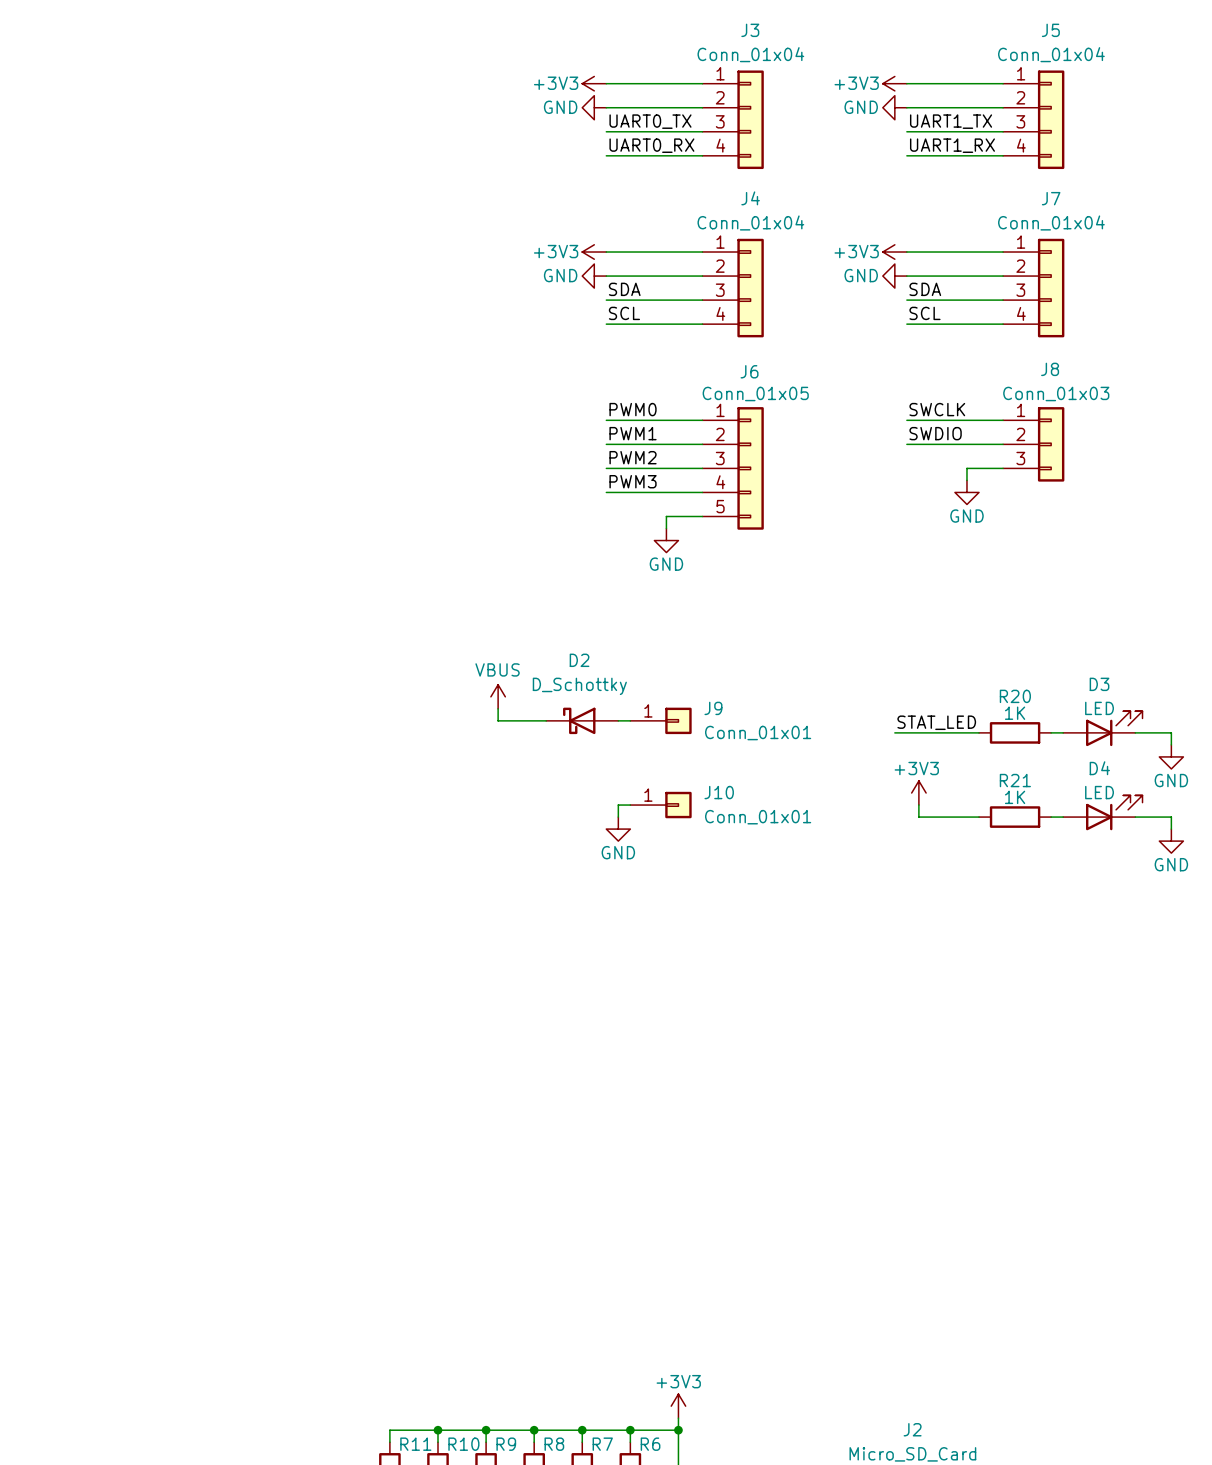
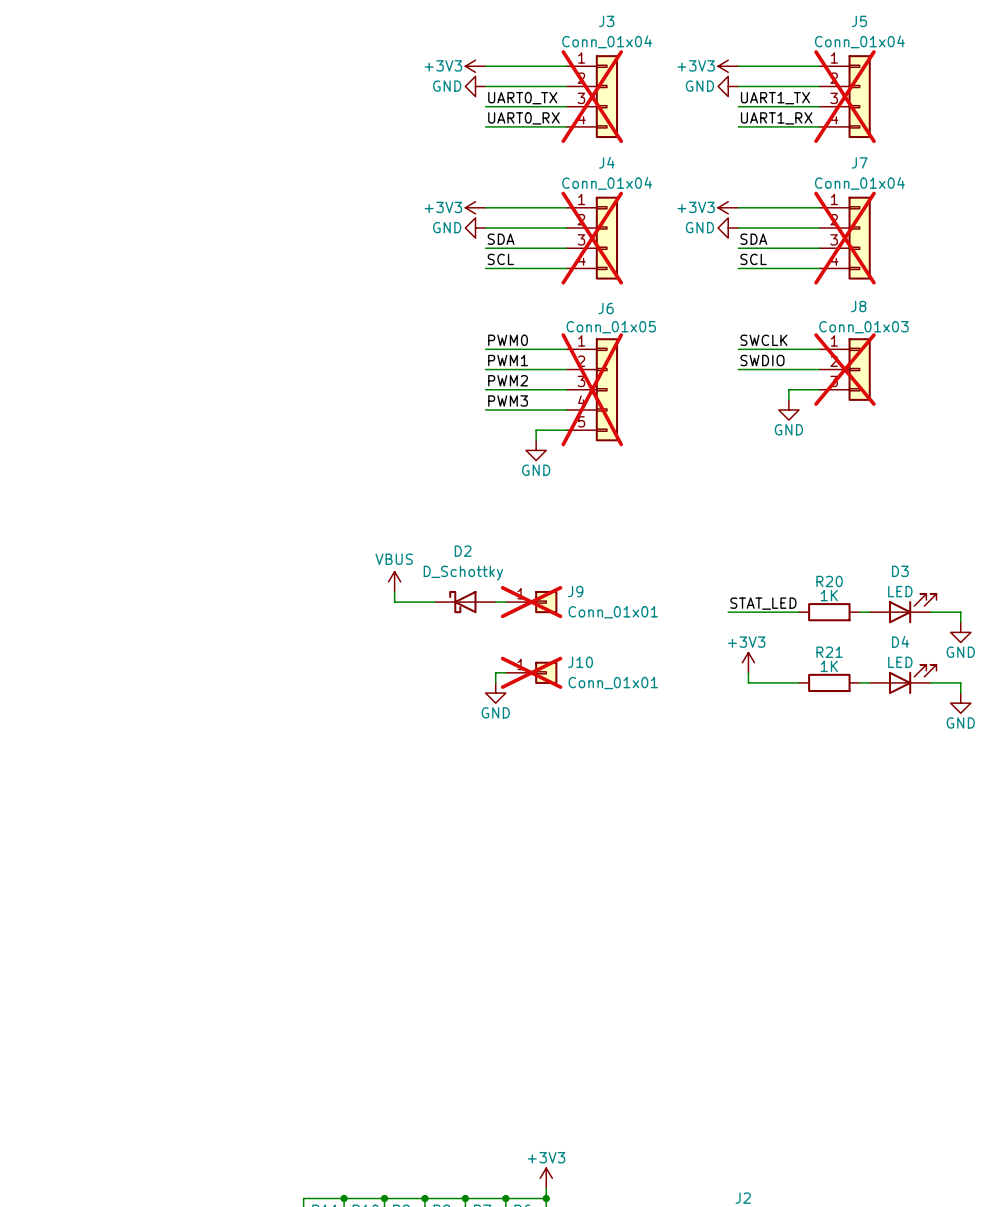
J3 do-not-place cross: none -> (592, 96)
J5 do-not-place cross: none -> (844, 96)
J4 do-not-place cross: none -> (592, 238)
J7 do-not-place cross: none -> (844, 238)
J8 do-not-place cross: none -> (844, 369)
J6 do-not-place cross: none -> (592, 389)
J9 do-not-place cross: none -> (531, 602)
J10 do-not-place cross: none -> (531, 672)

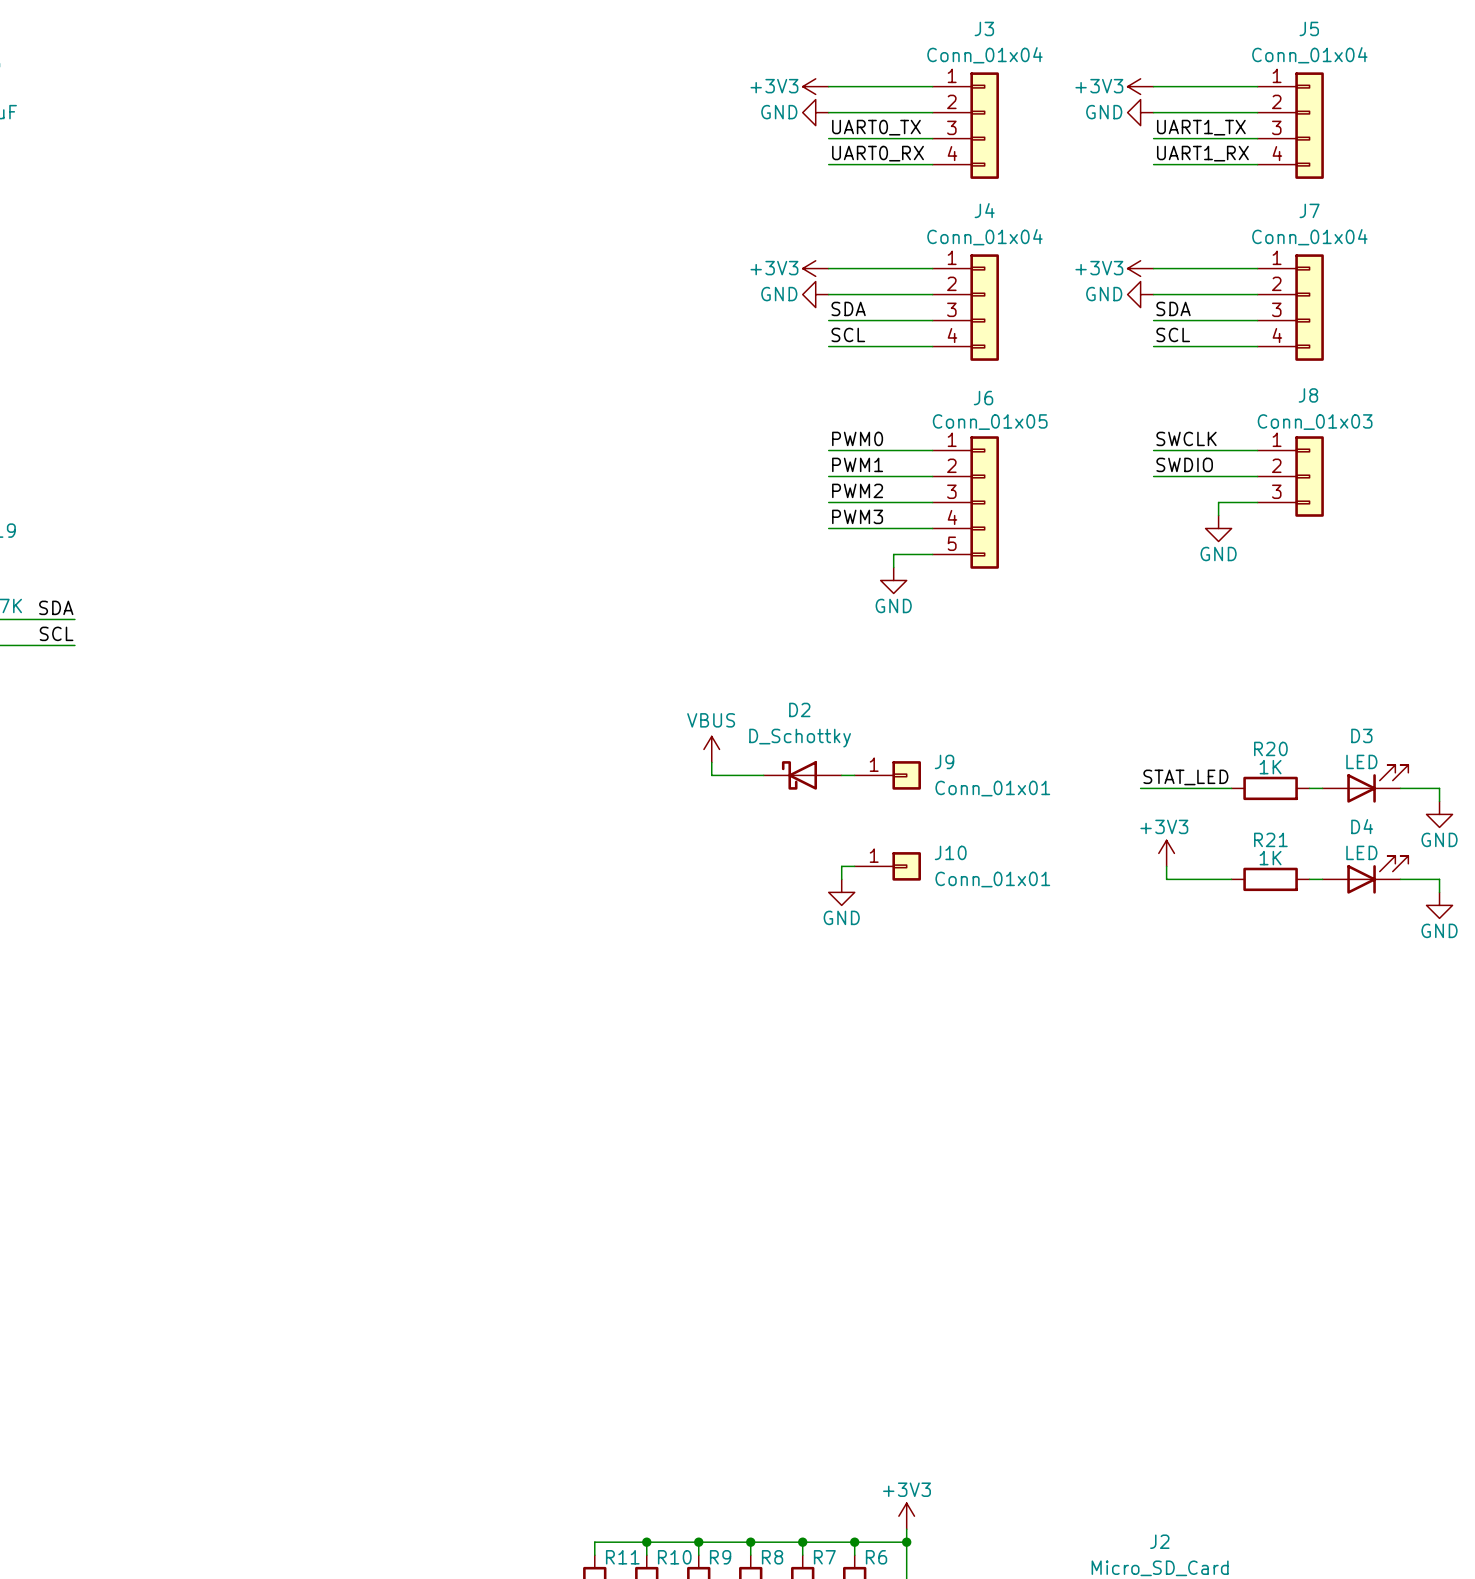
J3 do-not-place cross: (592, 96) -> none
J5 do-not-place cross: (844, 96) -> none
J4 do-not-place cross: (592, 238) -> none
J7 do-not-place cross: (844, 238) -> none
J8 do-not-place cross: (844, 369) -> none
J6 do-not-place cross: (592, 389) -> none
J9 do-not-place cross: (531, 602) -> none
J10 do-not-place cross: (531, 672) -> none

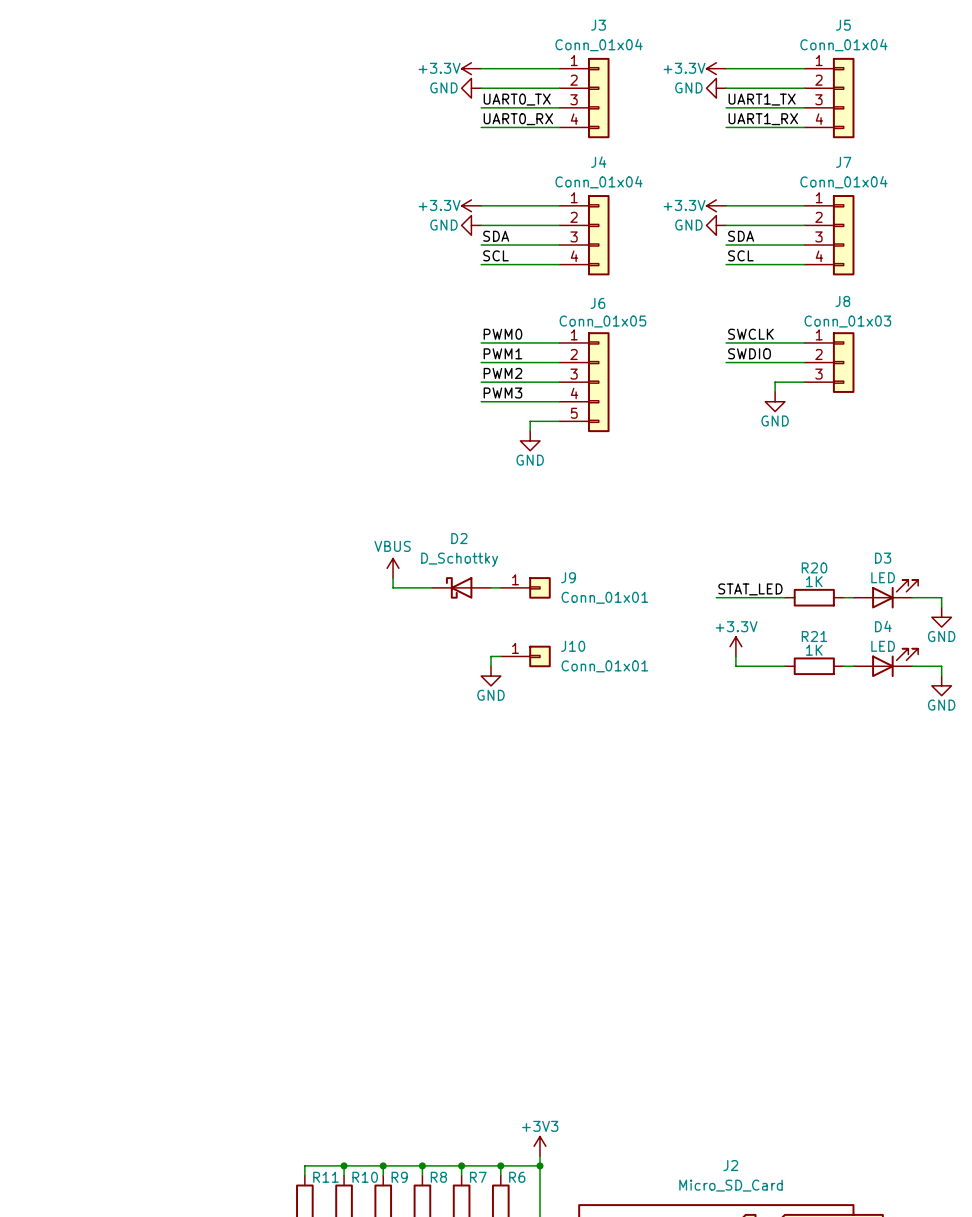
power symbol: +3V3 (815, 86) -> +3.3V (471, 68)
power symbol: +3V3 (1140, 86) -> +3.3V (716, 68)
power symbol: +3V3 (815, 268) -> +3.3V (471, 205)
power symbol: +3V3 (1140, 268) -> +3.3V (716, 205)
power symbol: +3V3 (1166, 853) -> +3.3V (735, 646)

